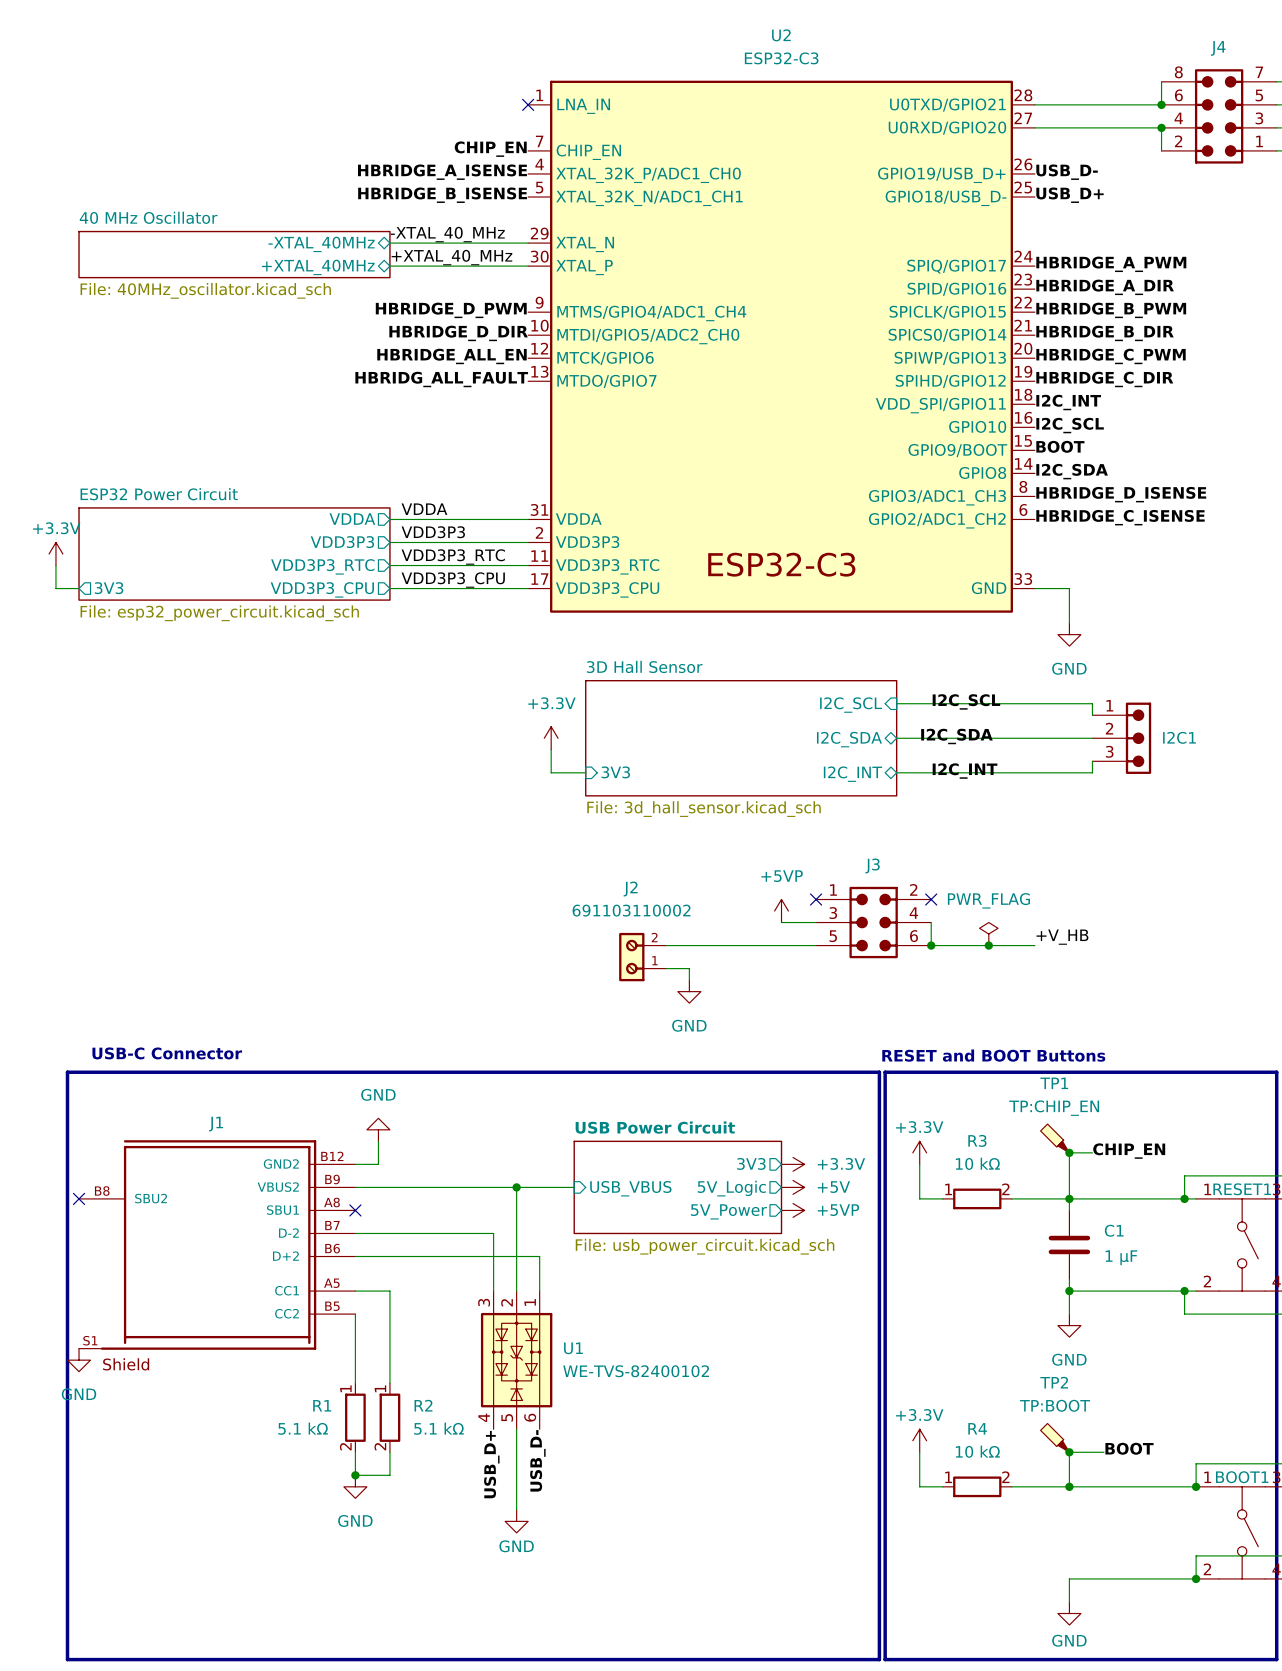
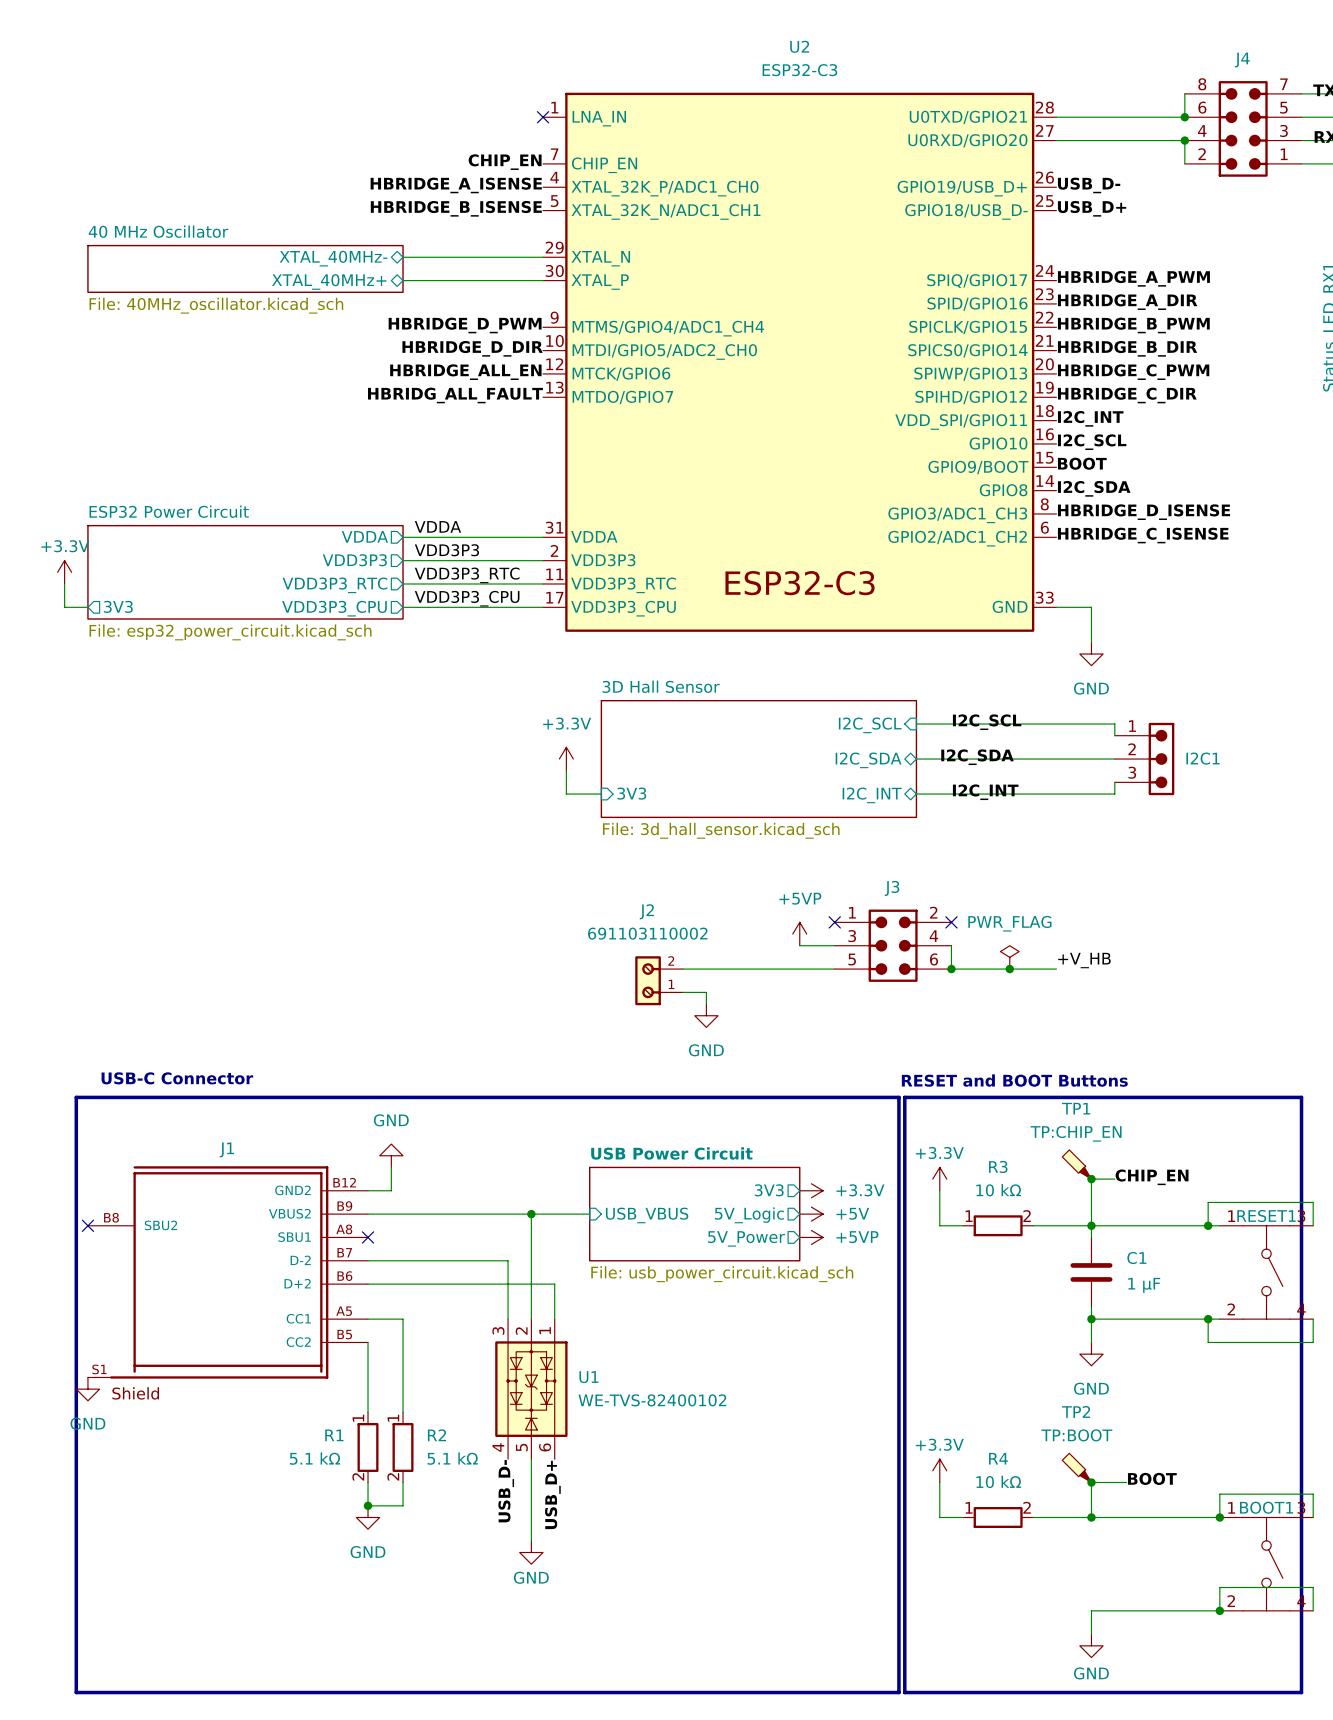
label: -XTAL_40_MHz (447, 234) -> none
sheet pin: -XTAL_40MHz (321, 244) -> XTAL_40MHz- (333, 258)
label: +XTAL_40_MHz (451, 257) -> none
sheet pin: +XTAL_40MHz (318, 267) -> XTAL_40MHz+ (329, 281)
label: USB_D- (537, 1460) -> USB_D+ (552, 1494)
label: USB_D+ (491, 1464) -> USB_D- (506, 1491)

